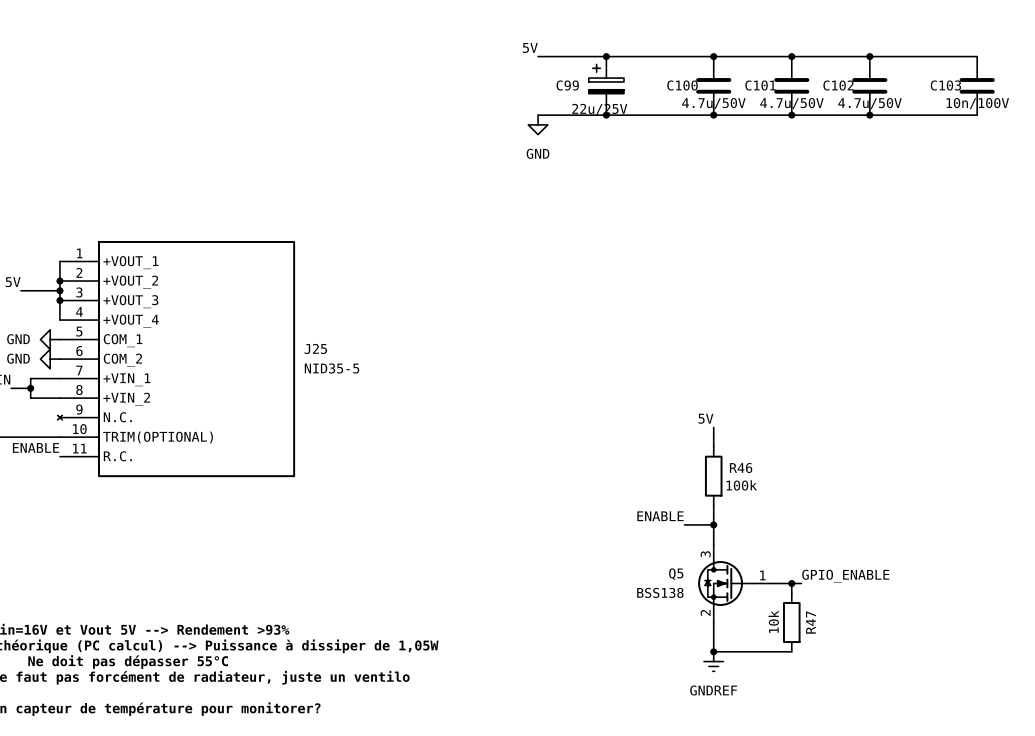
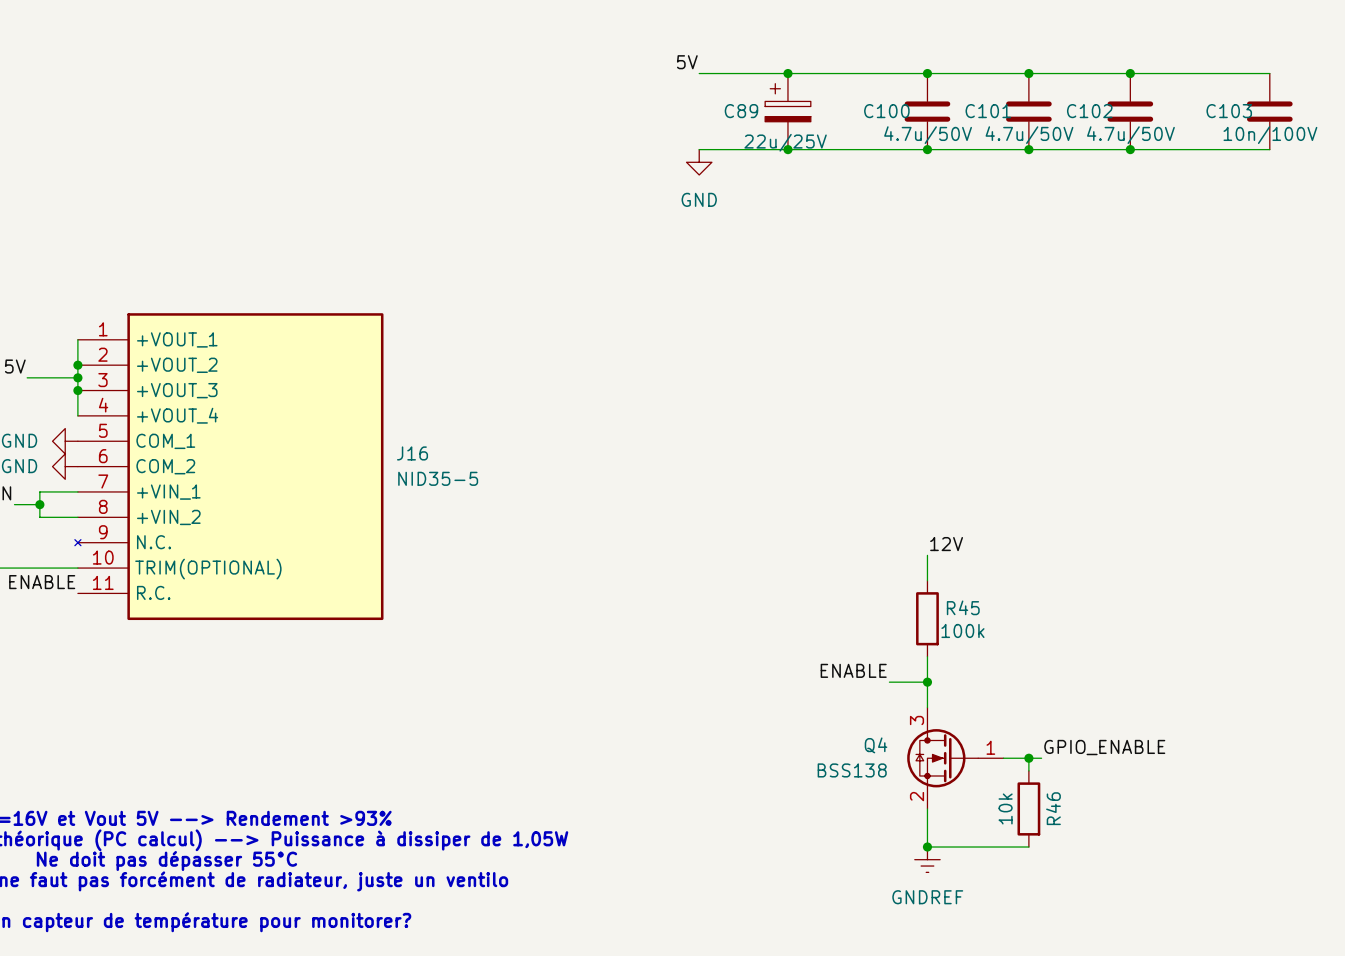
C99 name: C99 (567, 85) -> C89 (741, 111)
J25 name: J25 (315, 348) -> J16 (412, 453)
label: 5V (705, 418) -> 12V (946, 544)
R46 name: R46 (741, 468) -> R45 (963, 607)
Q5 name: Q5 (676, 574) -> Q4 (876, 745)
R47 name: R47 (810, 622) -> R46 (1053, 808)

